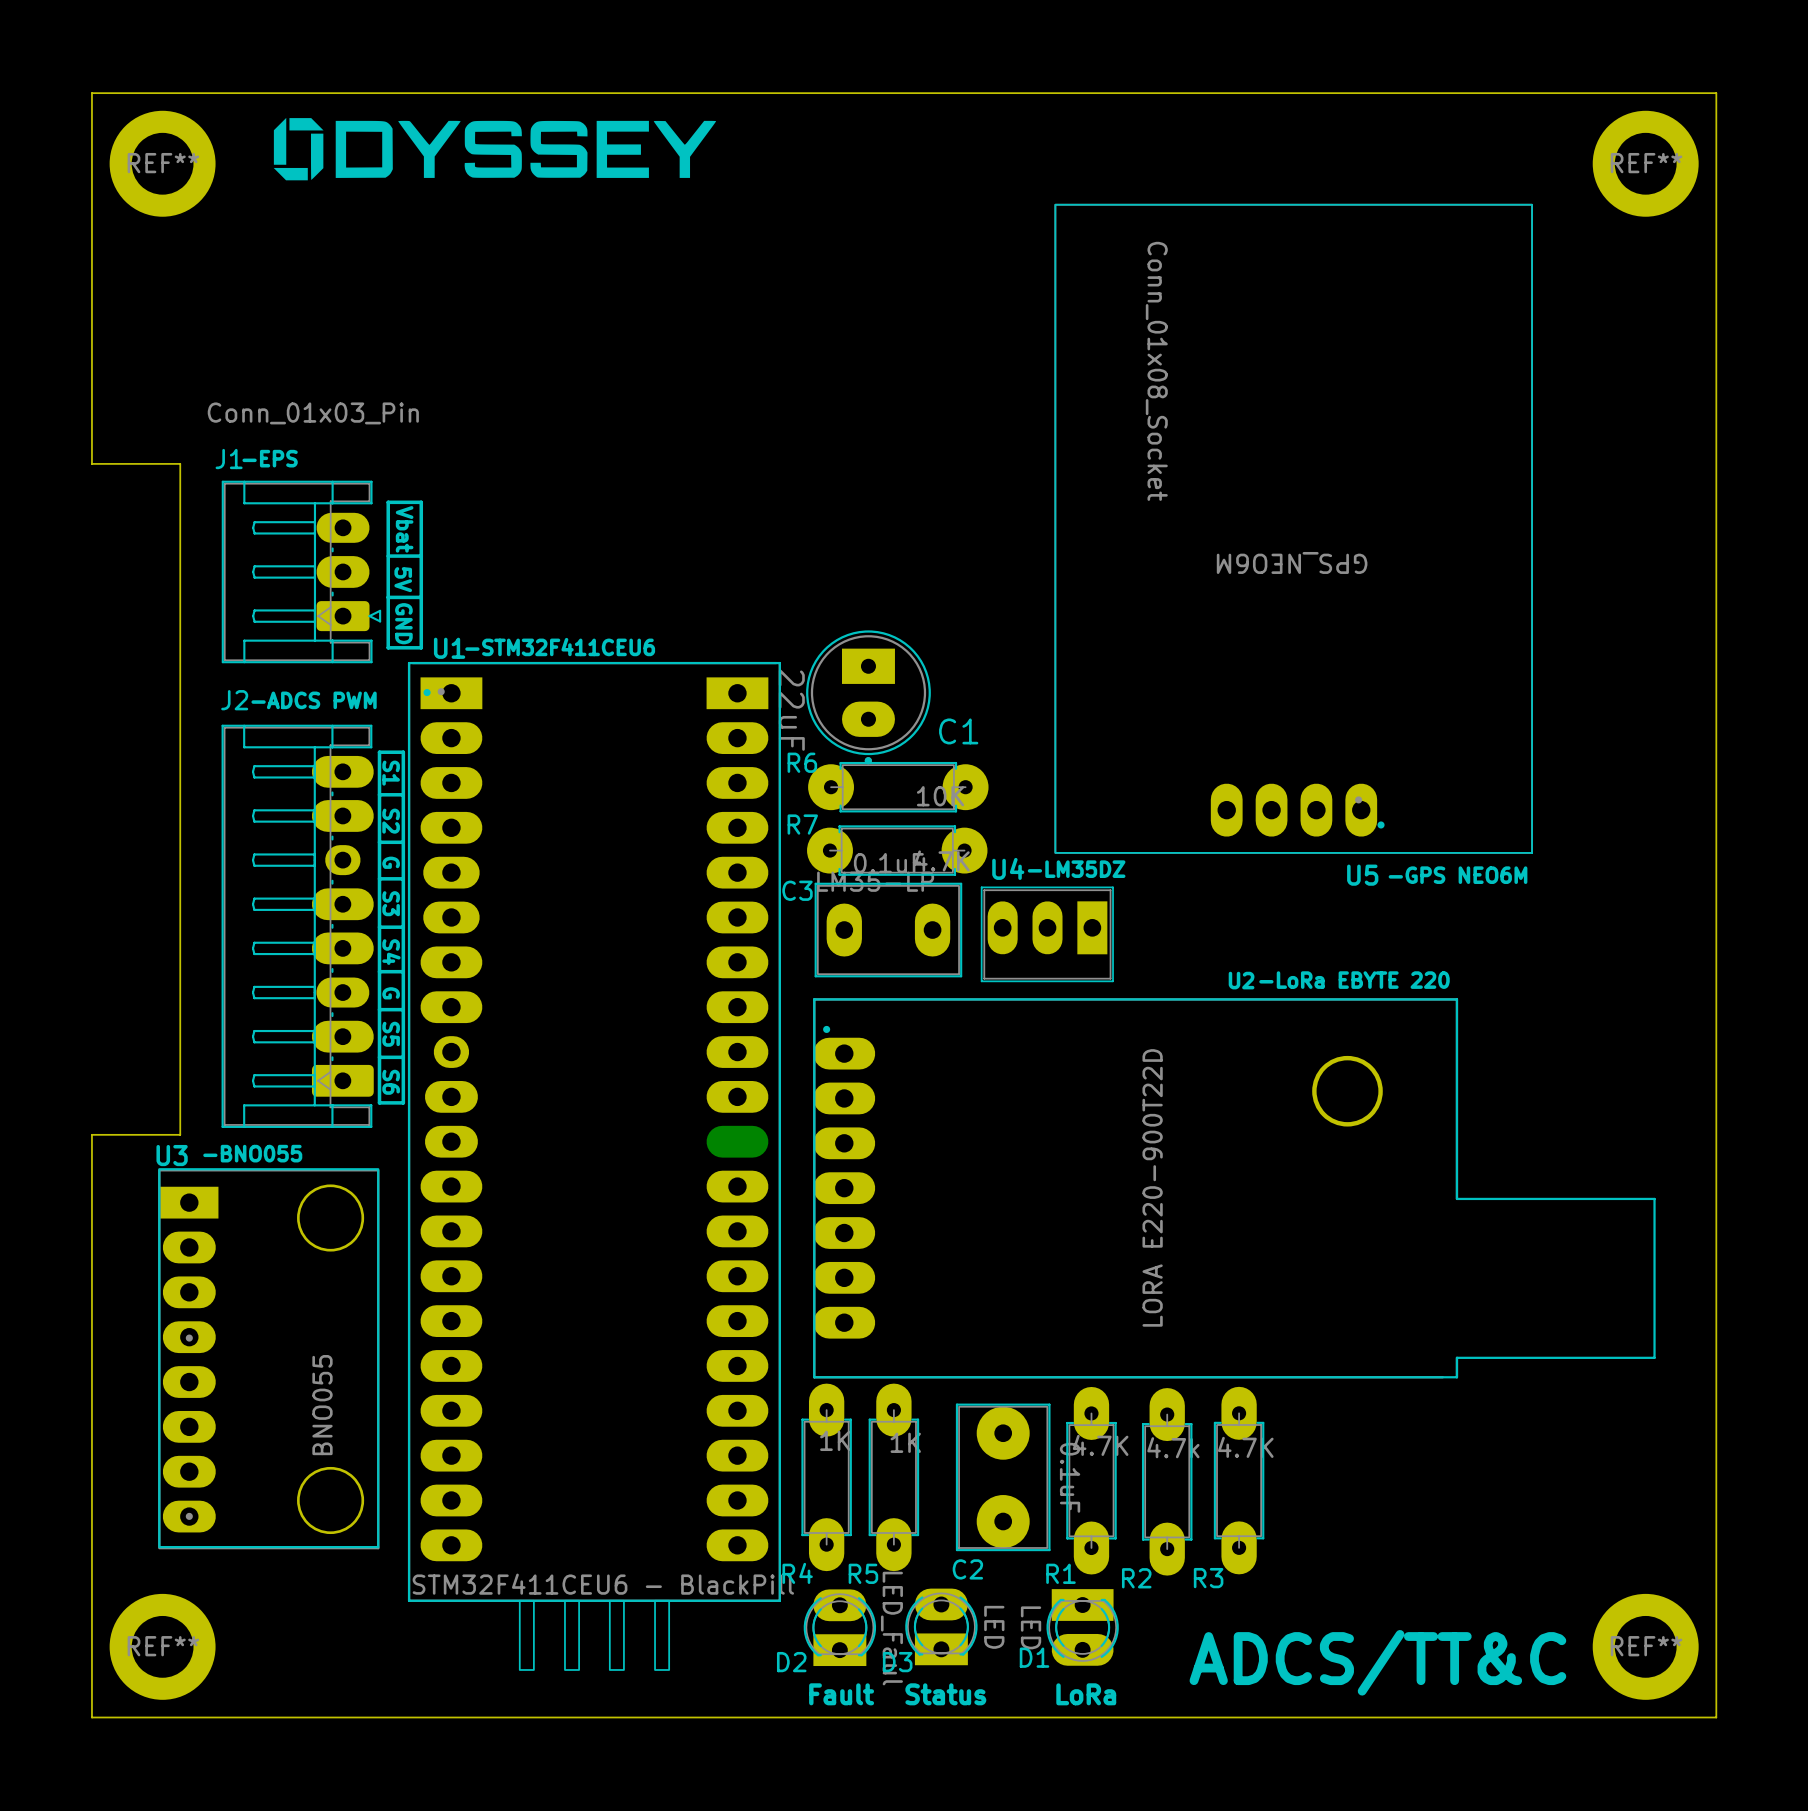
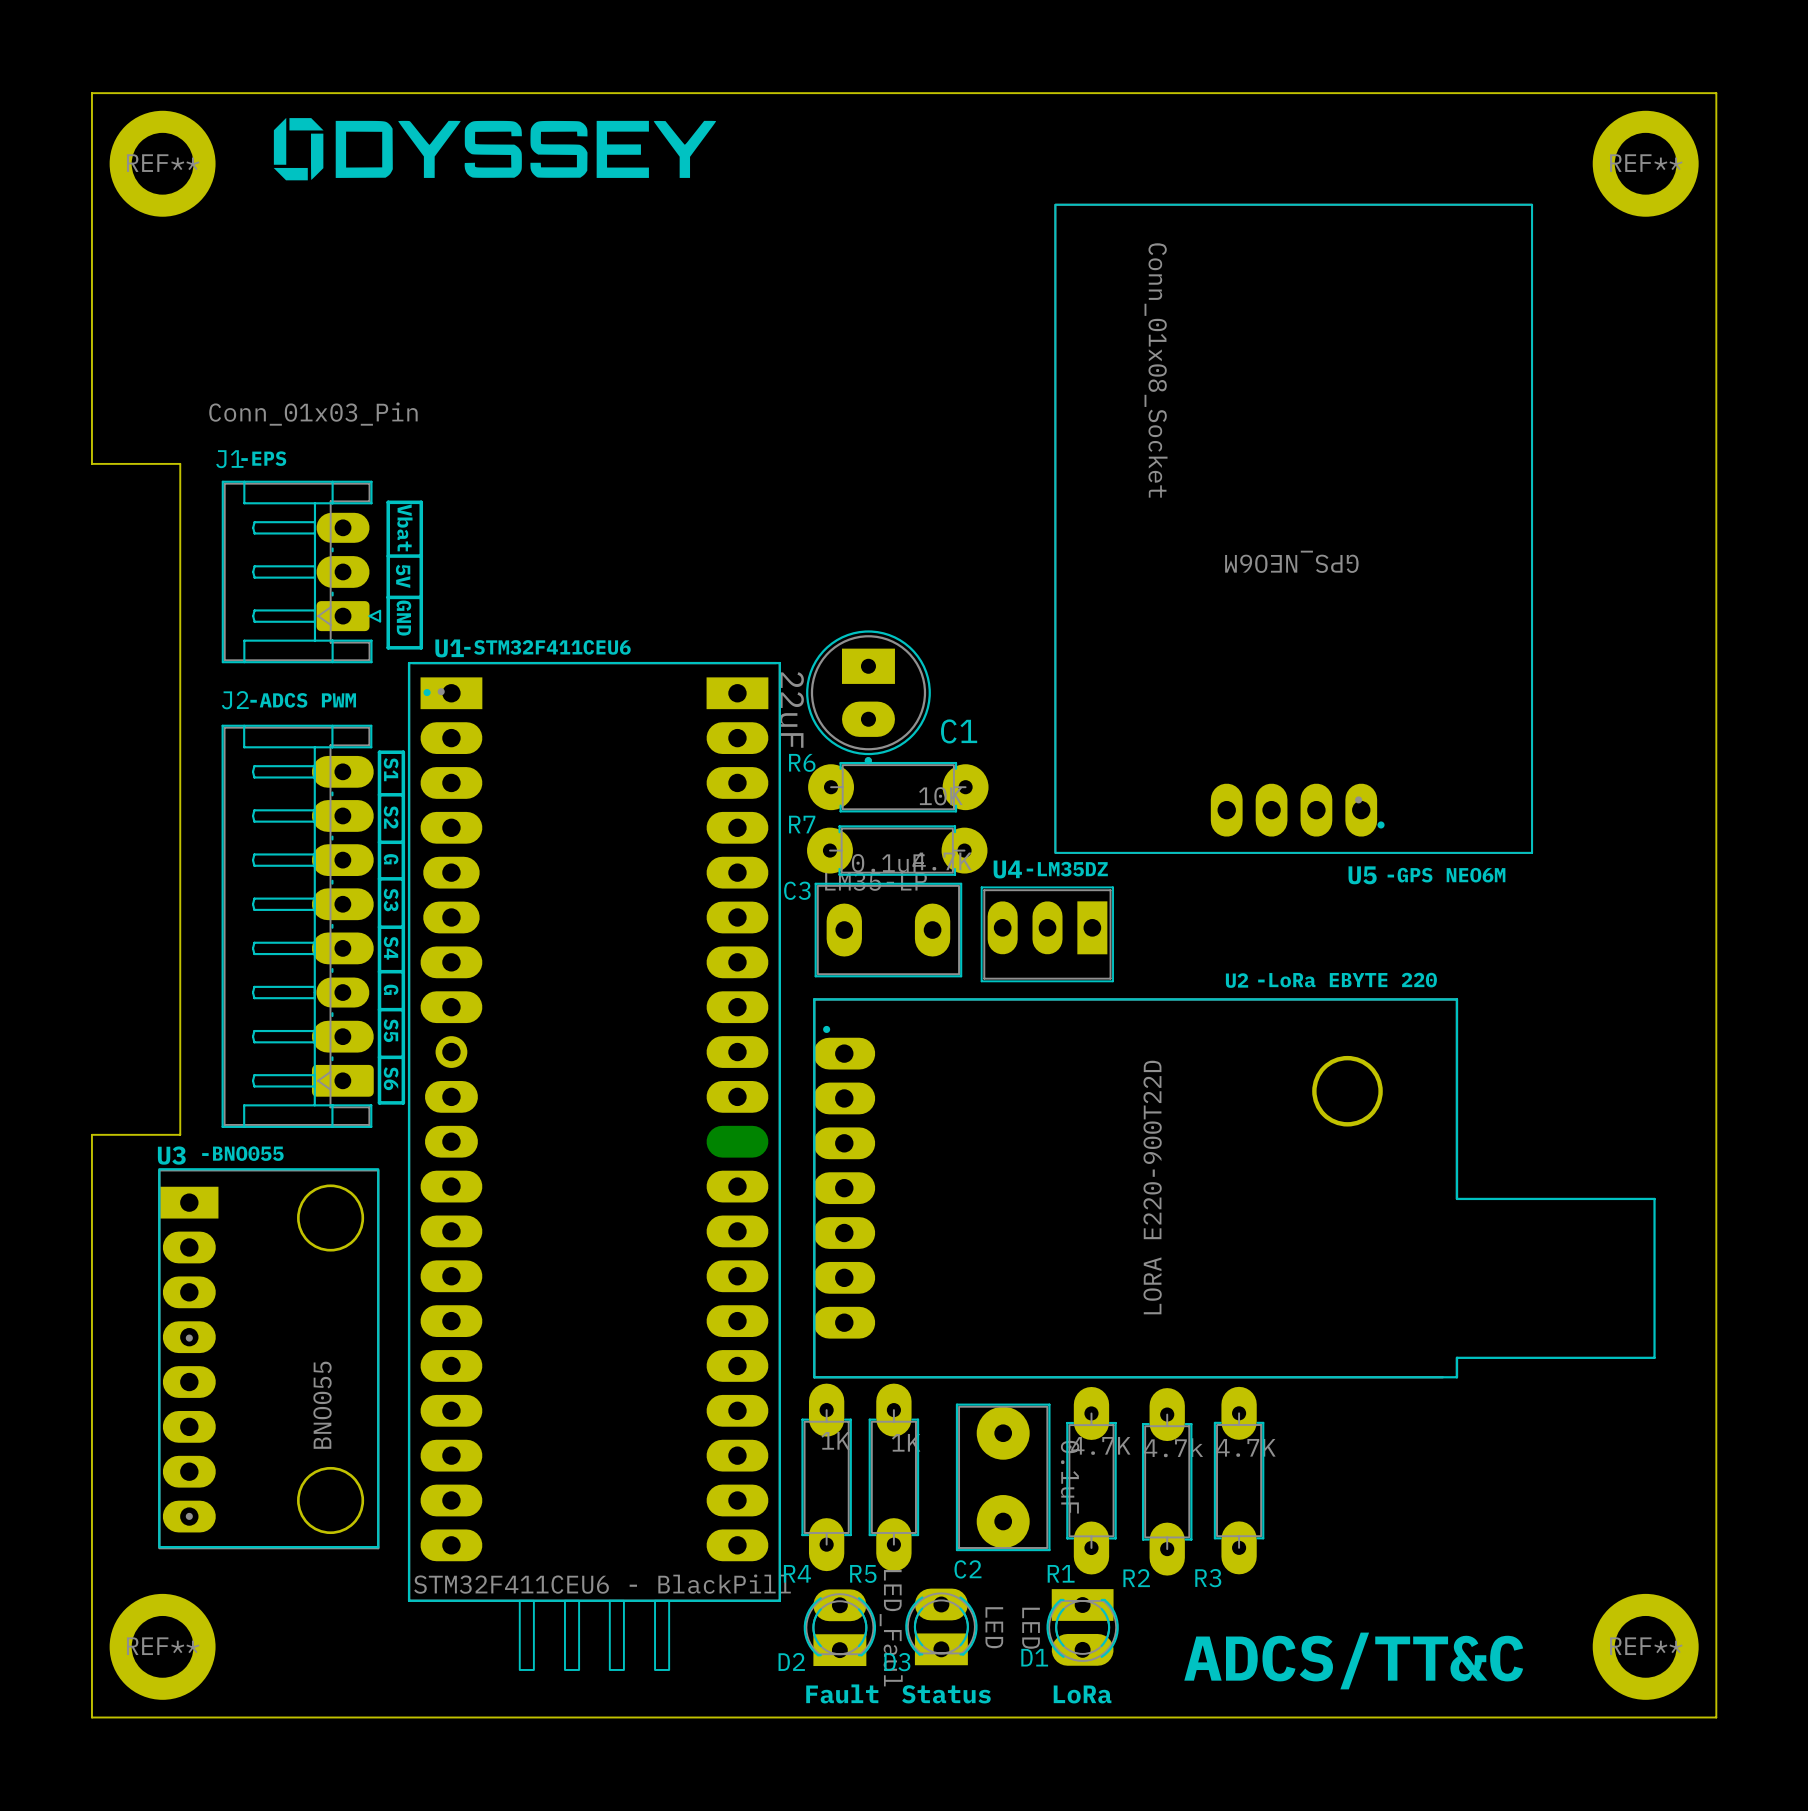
U1 footprint: [407, 661, 781, 1671] -> [407, 661, 781, 1671]
J2 footprint: [221, 724, 374, 1128] -> [221, 724, 374, 1128]

